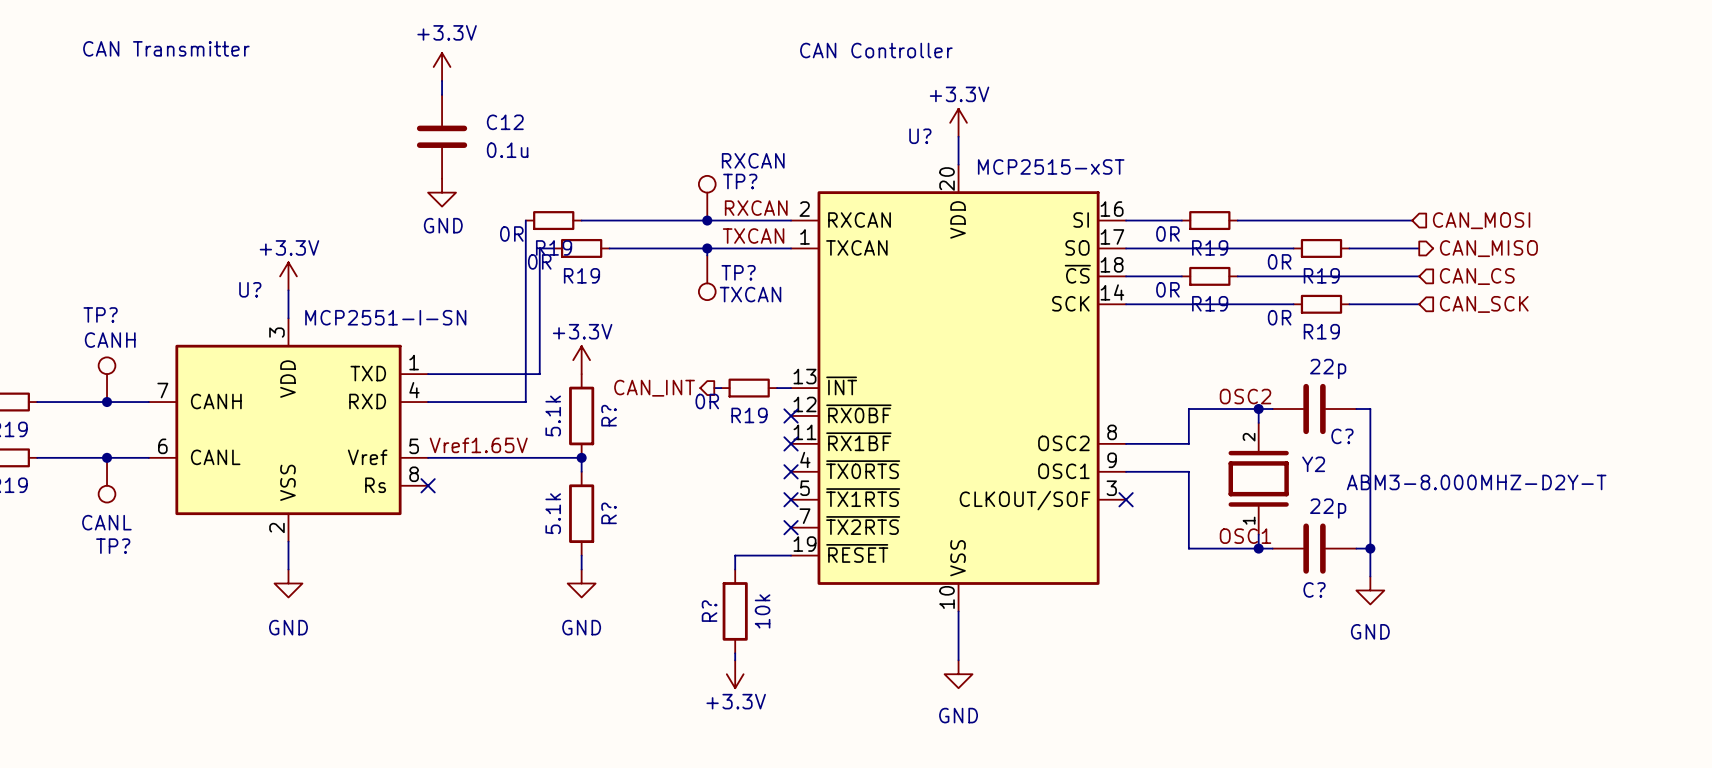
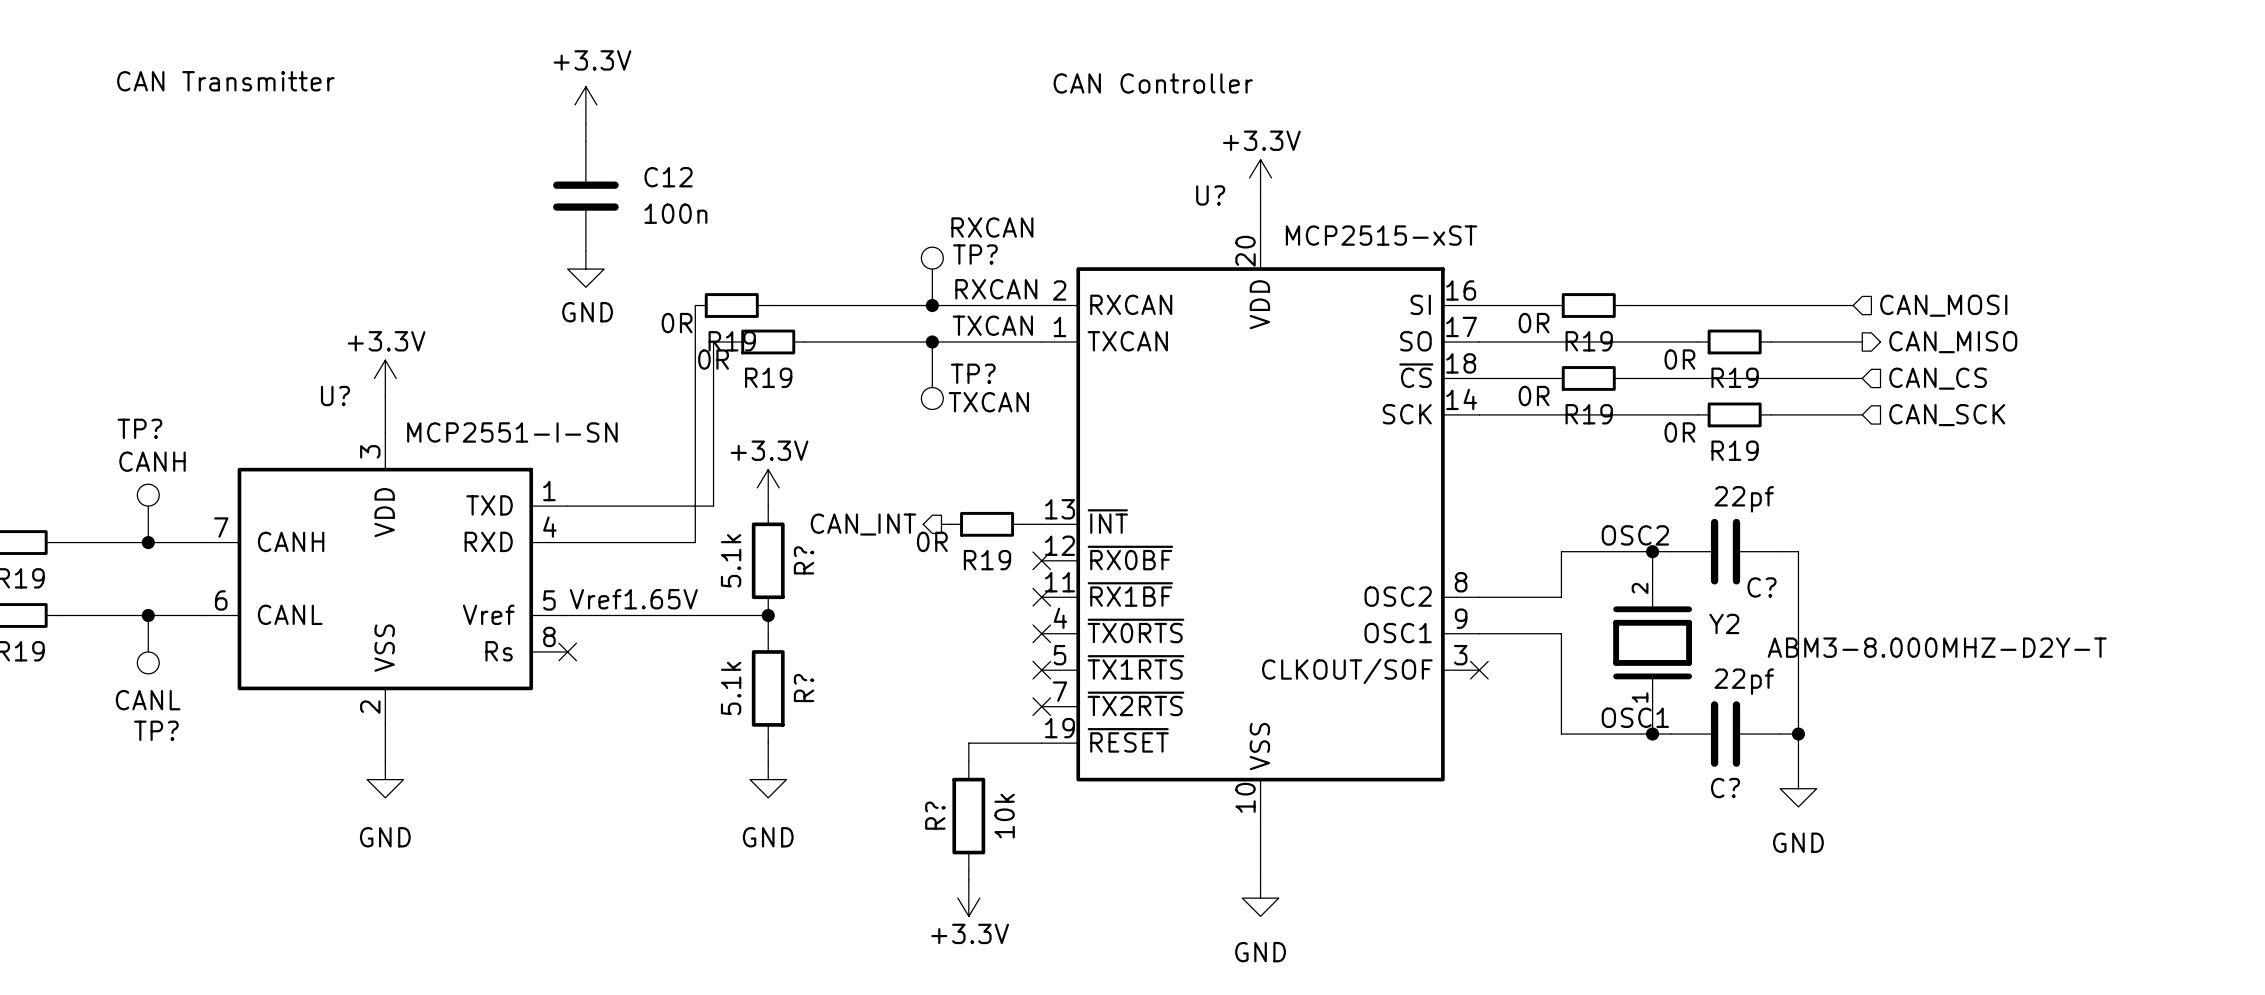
C12 value: 0.1u (507, 150) -> 100n (675, 213)
C? value: 22p (1328, 368) -> 22pf (1744, 499)
C? value: 22p (1328, 508) -> 22pf (1744, 681)

